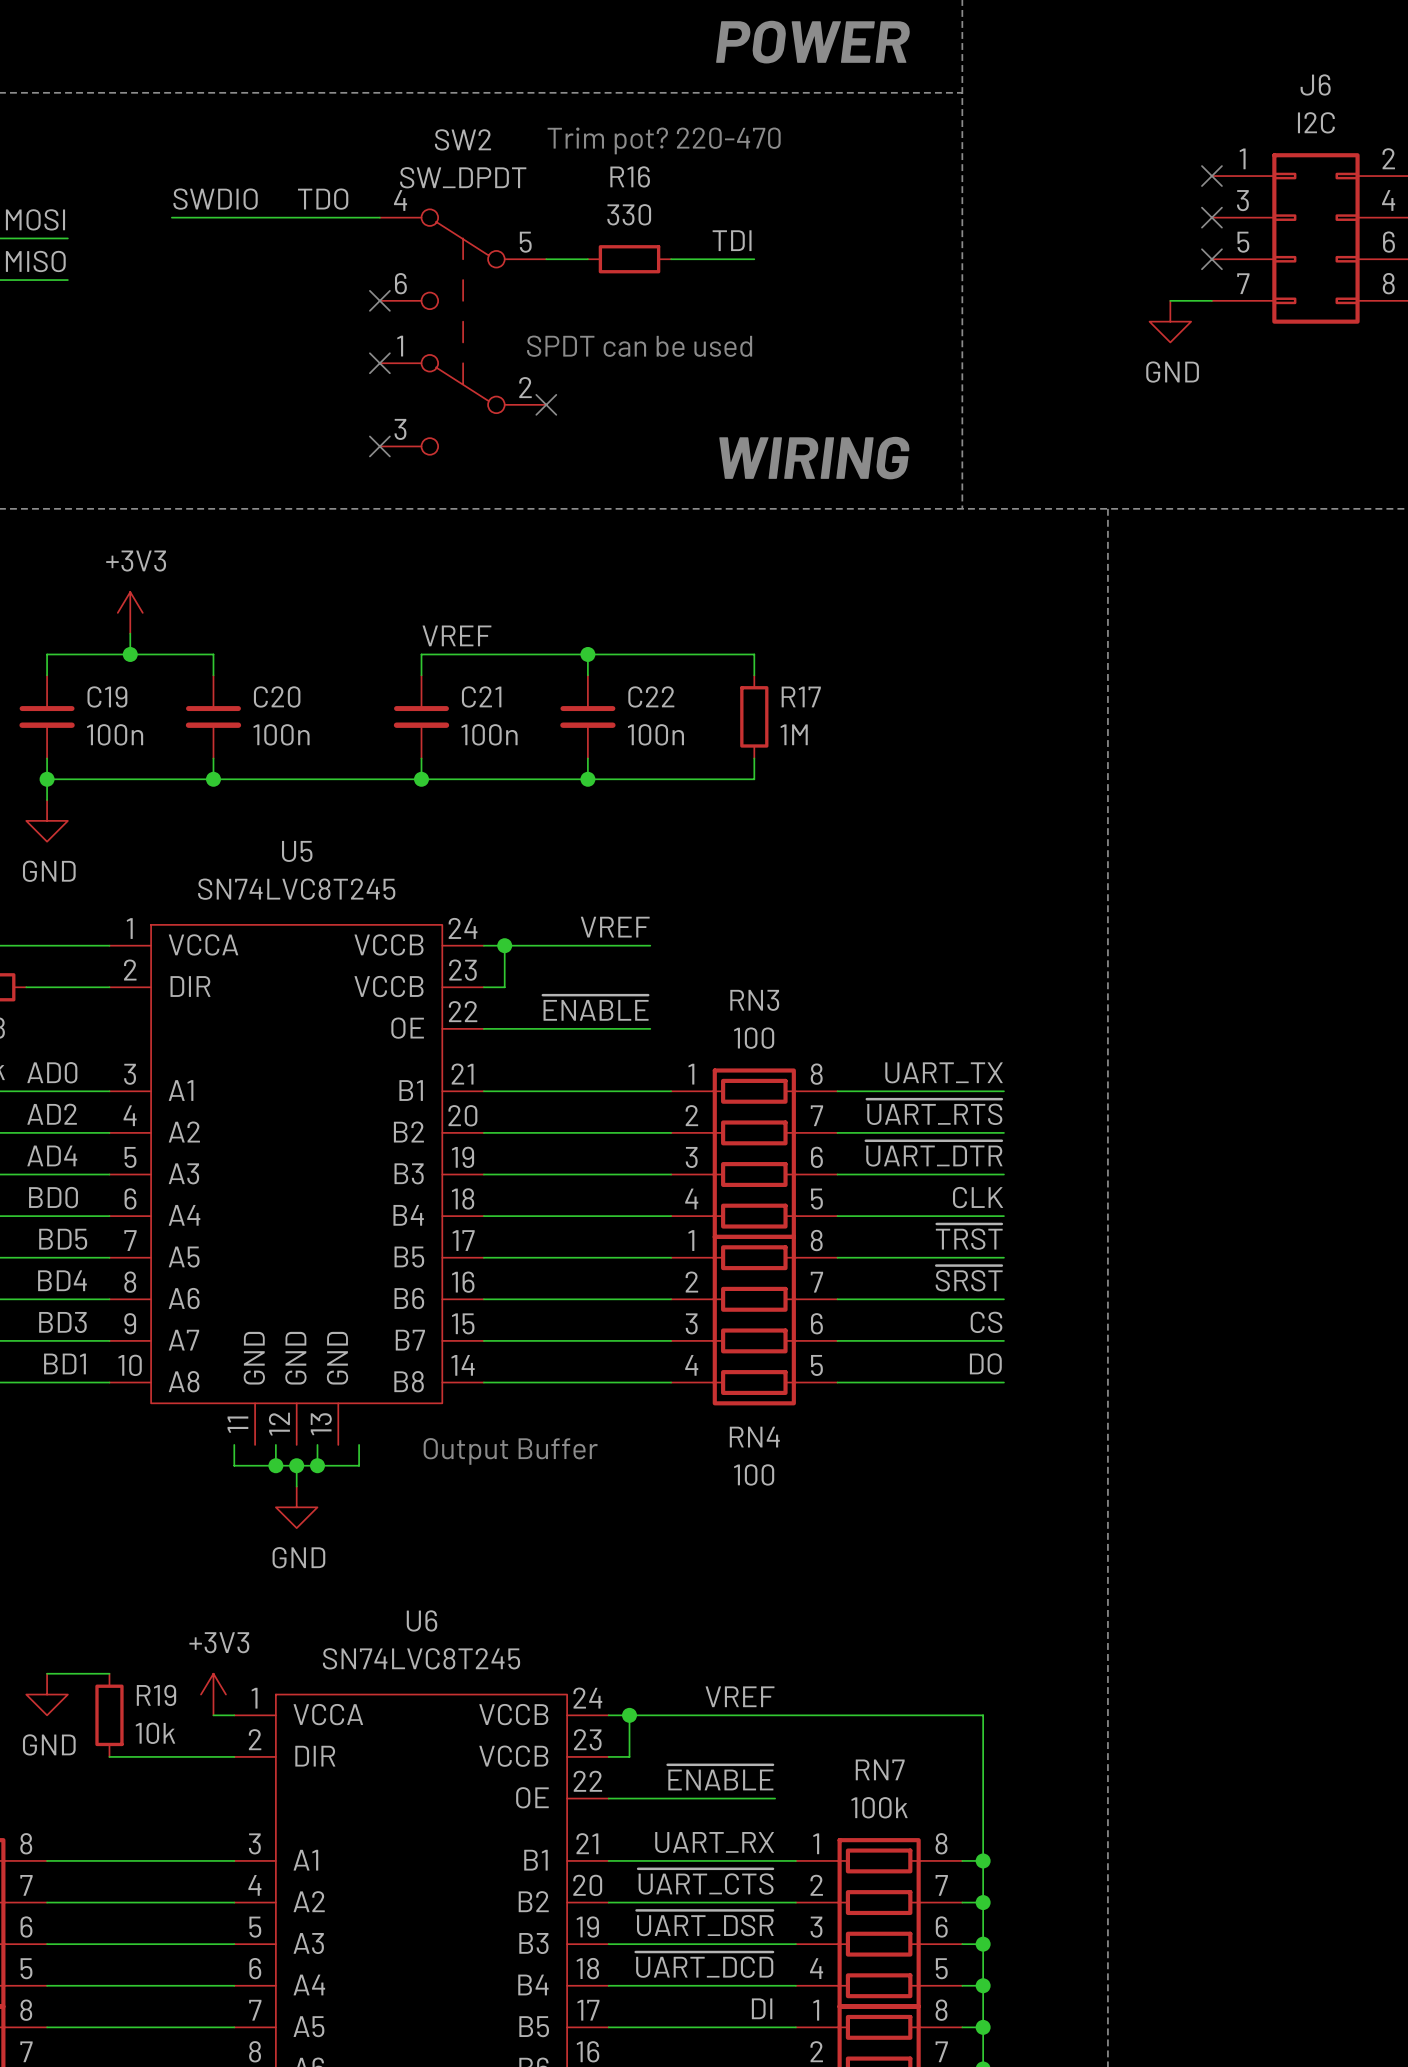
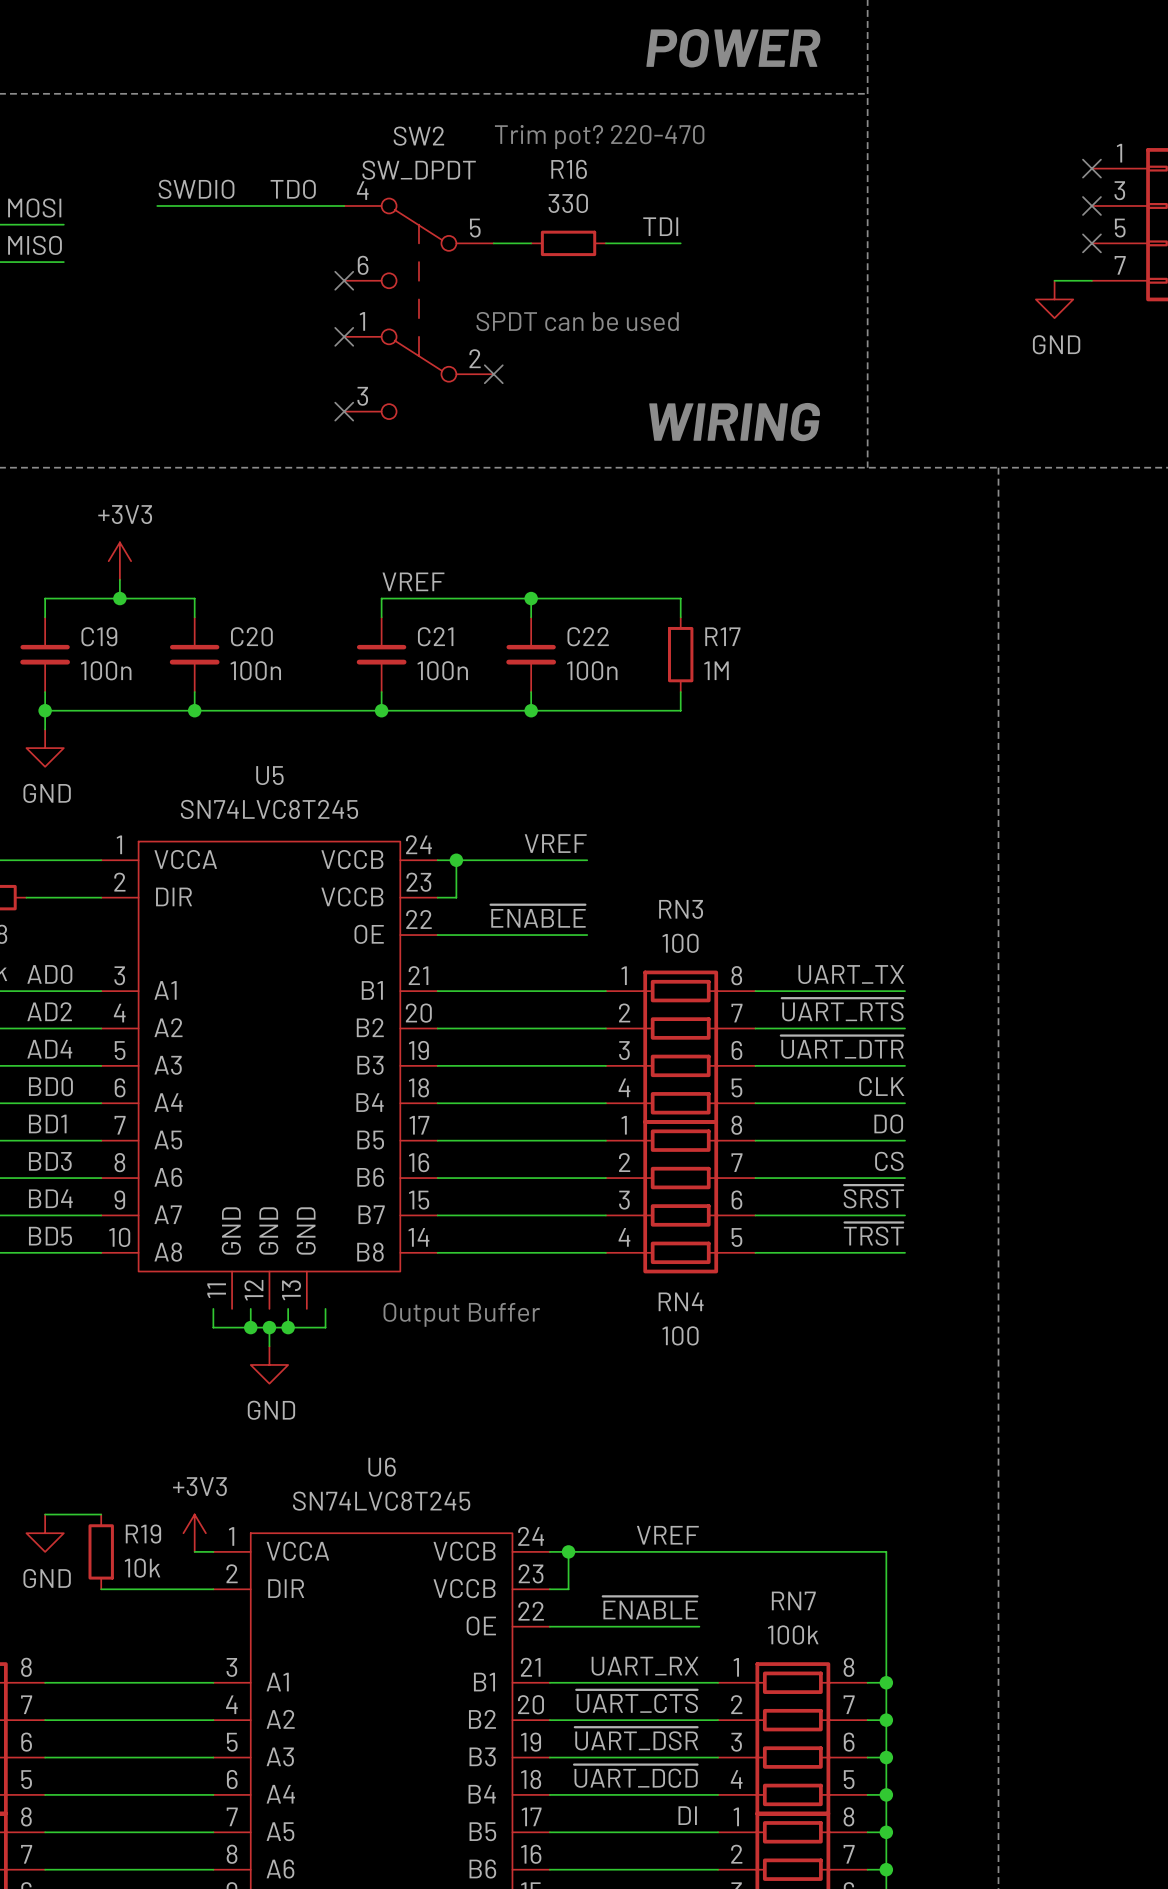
label: ~{TRST} (969, 1236) -> DO (888, 1123)
label position: BD5 (63, 1239) -> BD5 (50, 1236)
label: ~{SRST} (969, 1278) -> CS (889, 1161)
label position: BD4 (62, 1280) -> BD4 (50, 1198)
label position: BD3 (62, 1322) -> BD3 (50, 1161)
label: CS (986, 1322) -> ~{SRST} (873, 1196)
label position: BD1 (64, 1363) -> BD1 (47, 1123)
label: DO (985, 1363) -> ~{TRST} (873, 1234)

